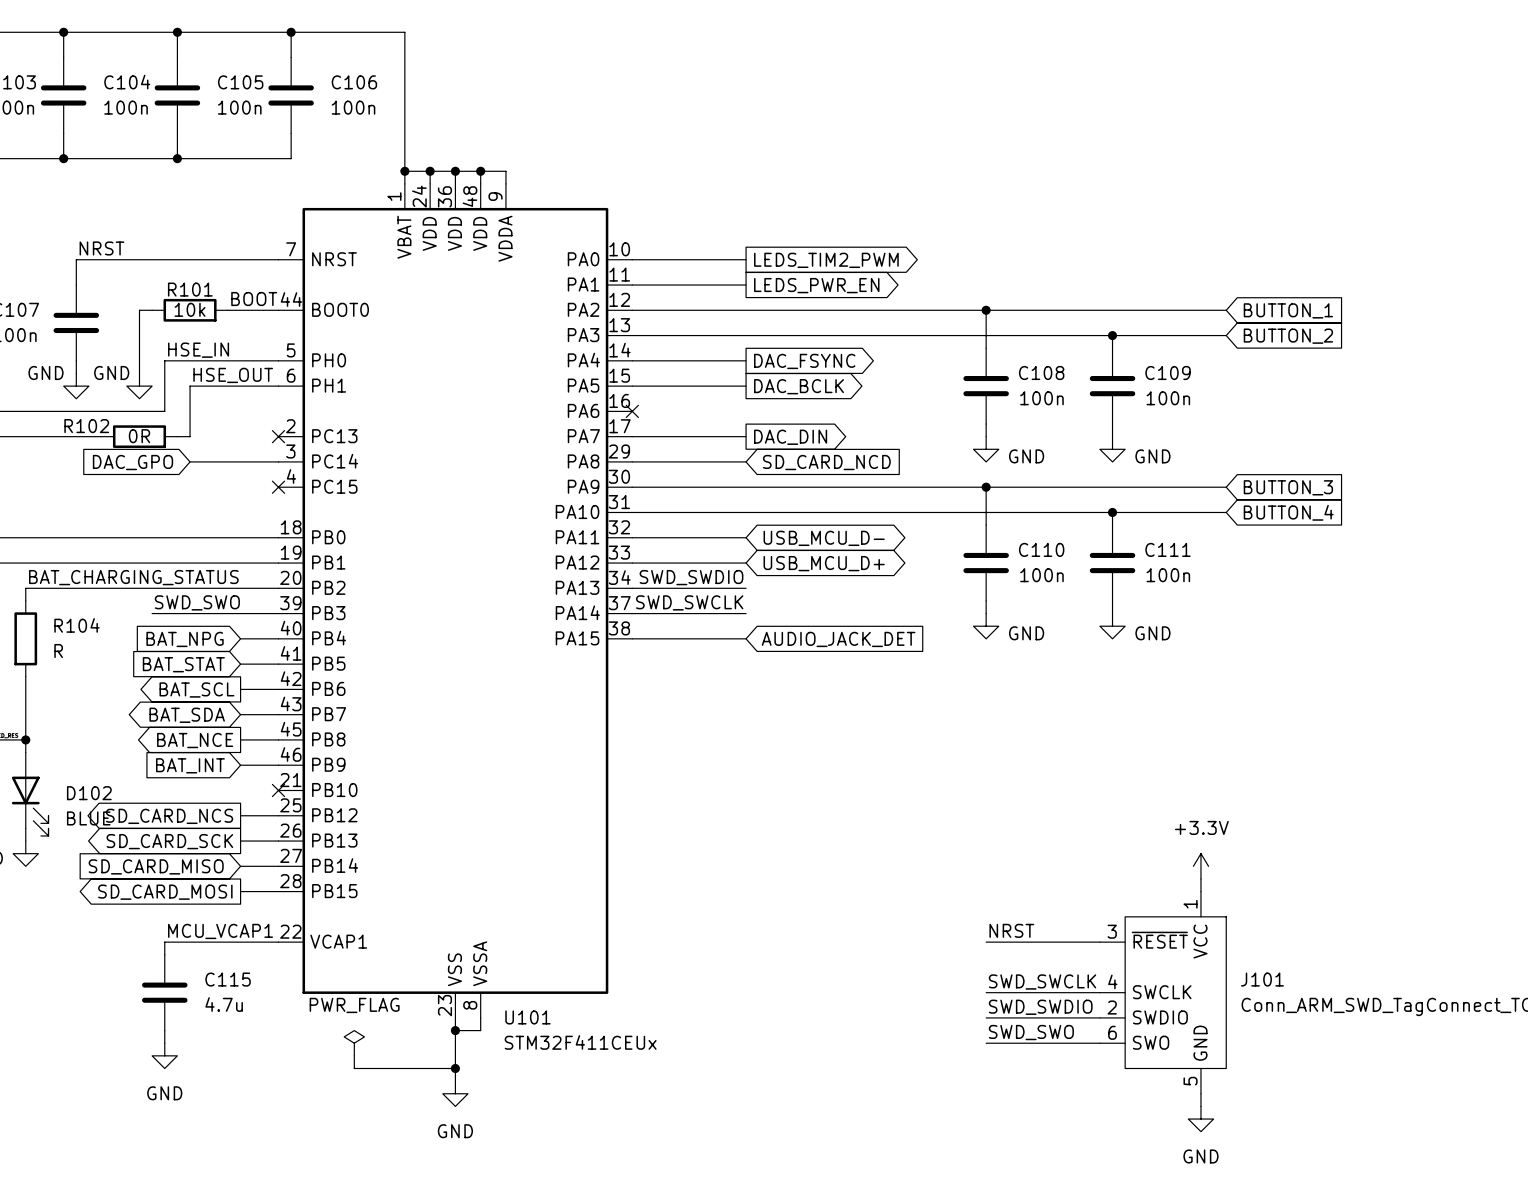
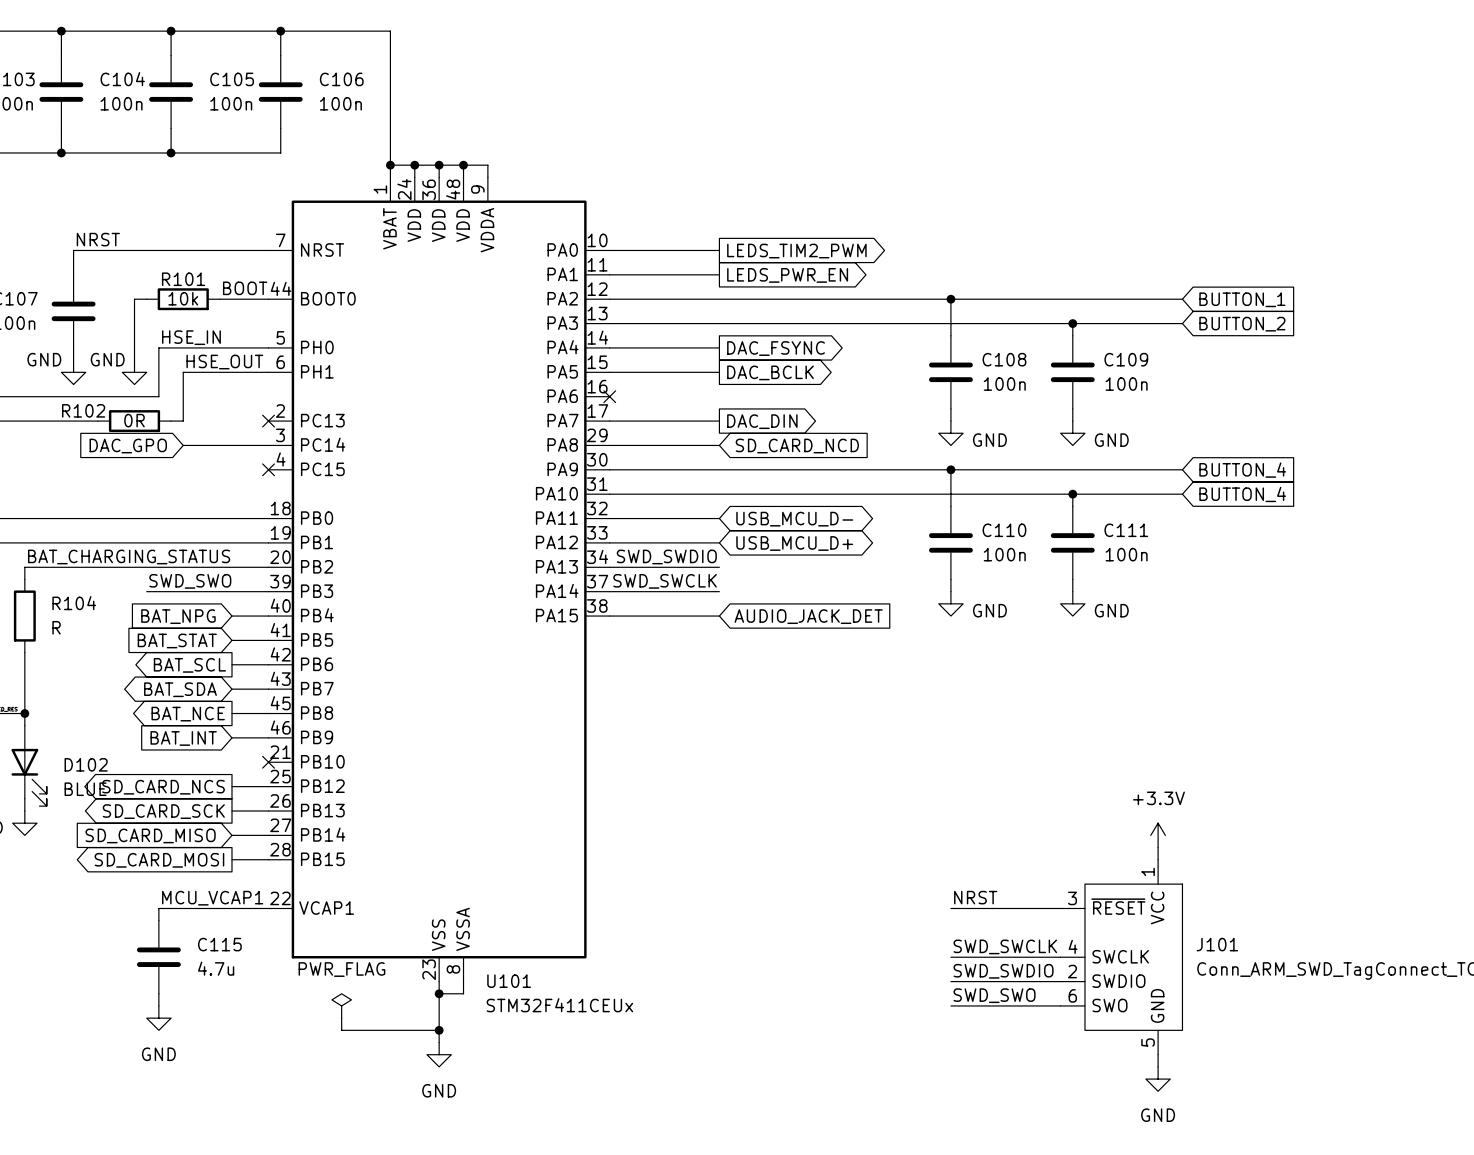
global label: BUTTON_3 (1288, 487) -> BUTTON_4 (1242, 470)

